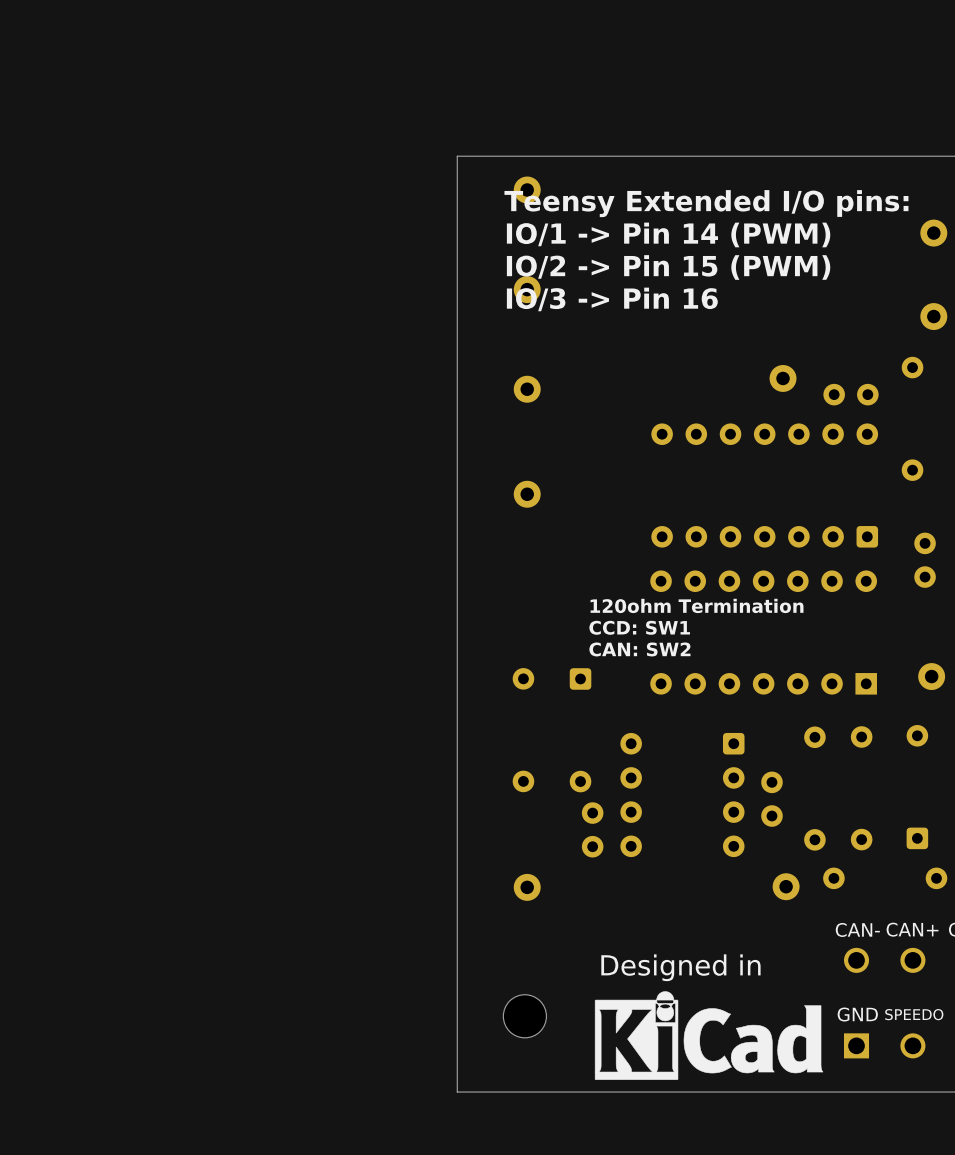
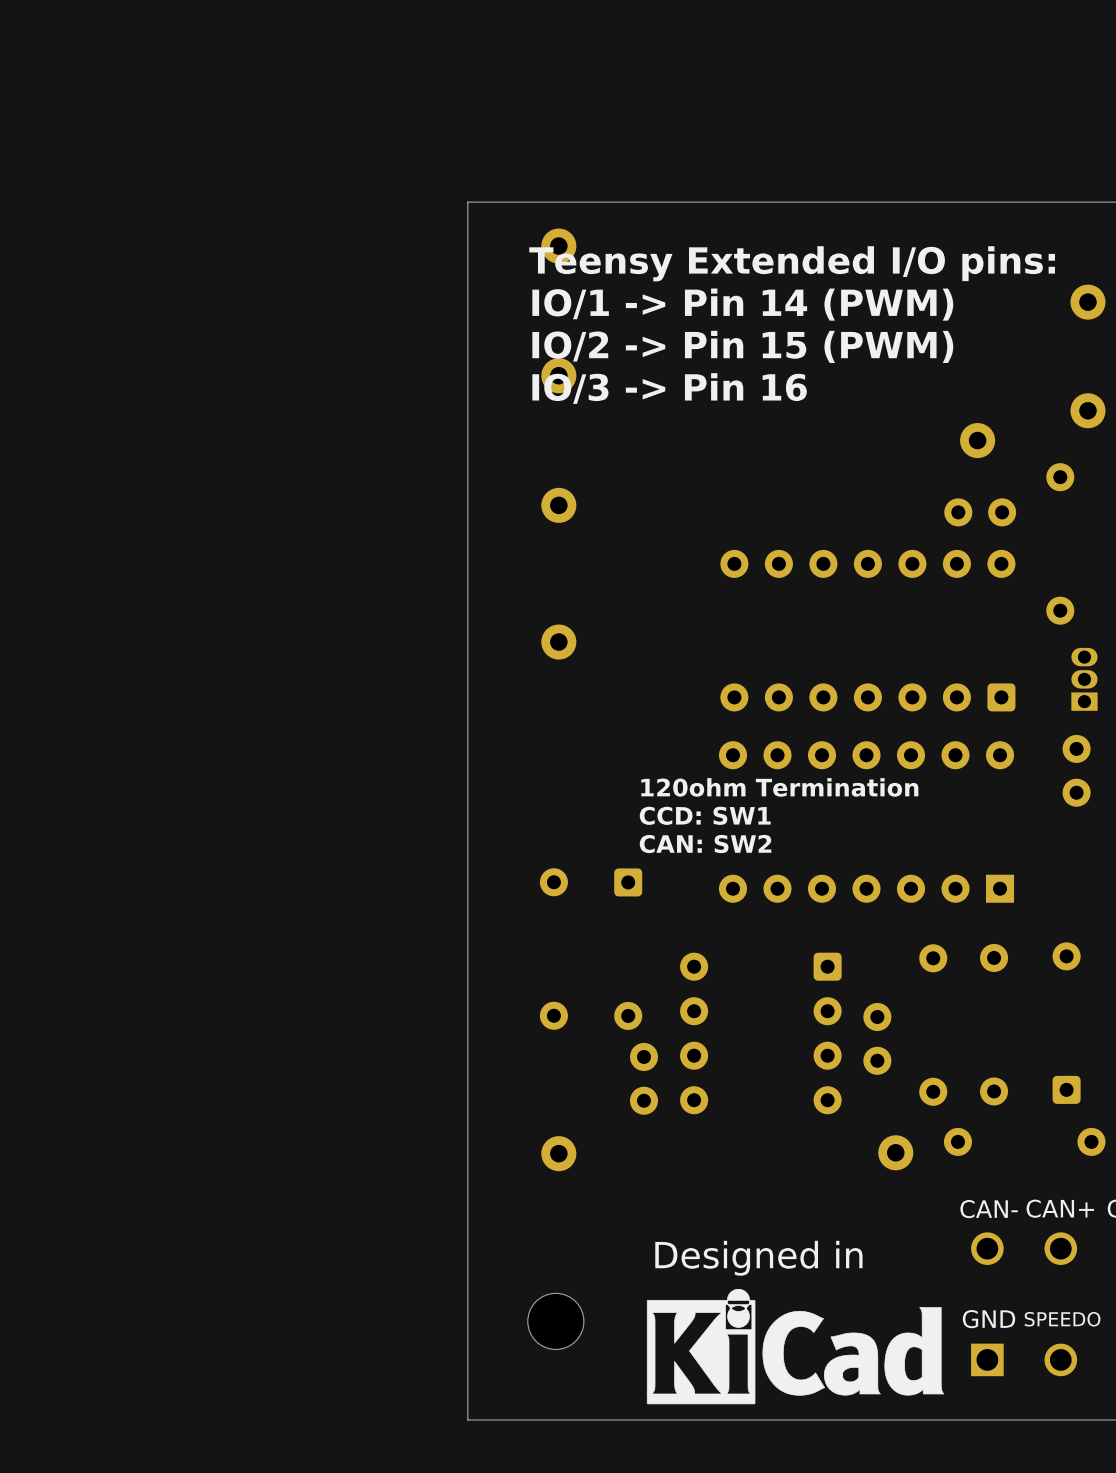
part position: (783, 378) -> (977, 440)
part: none -> (1084, 679)
part position: (925, 560) -> (1076, 770)
part: (931, 676) -> none

